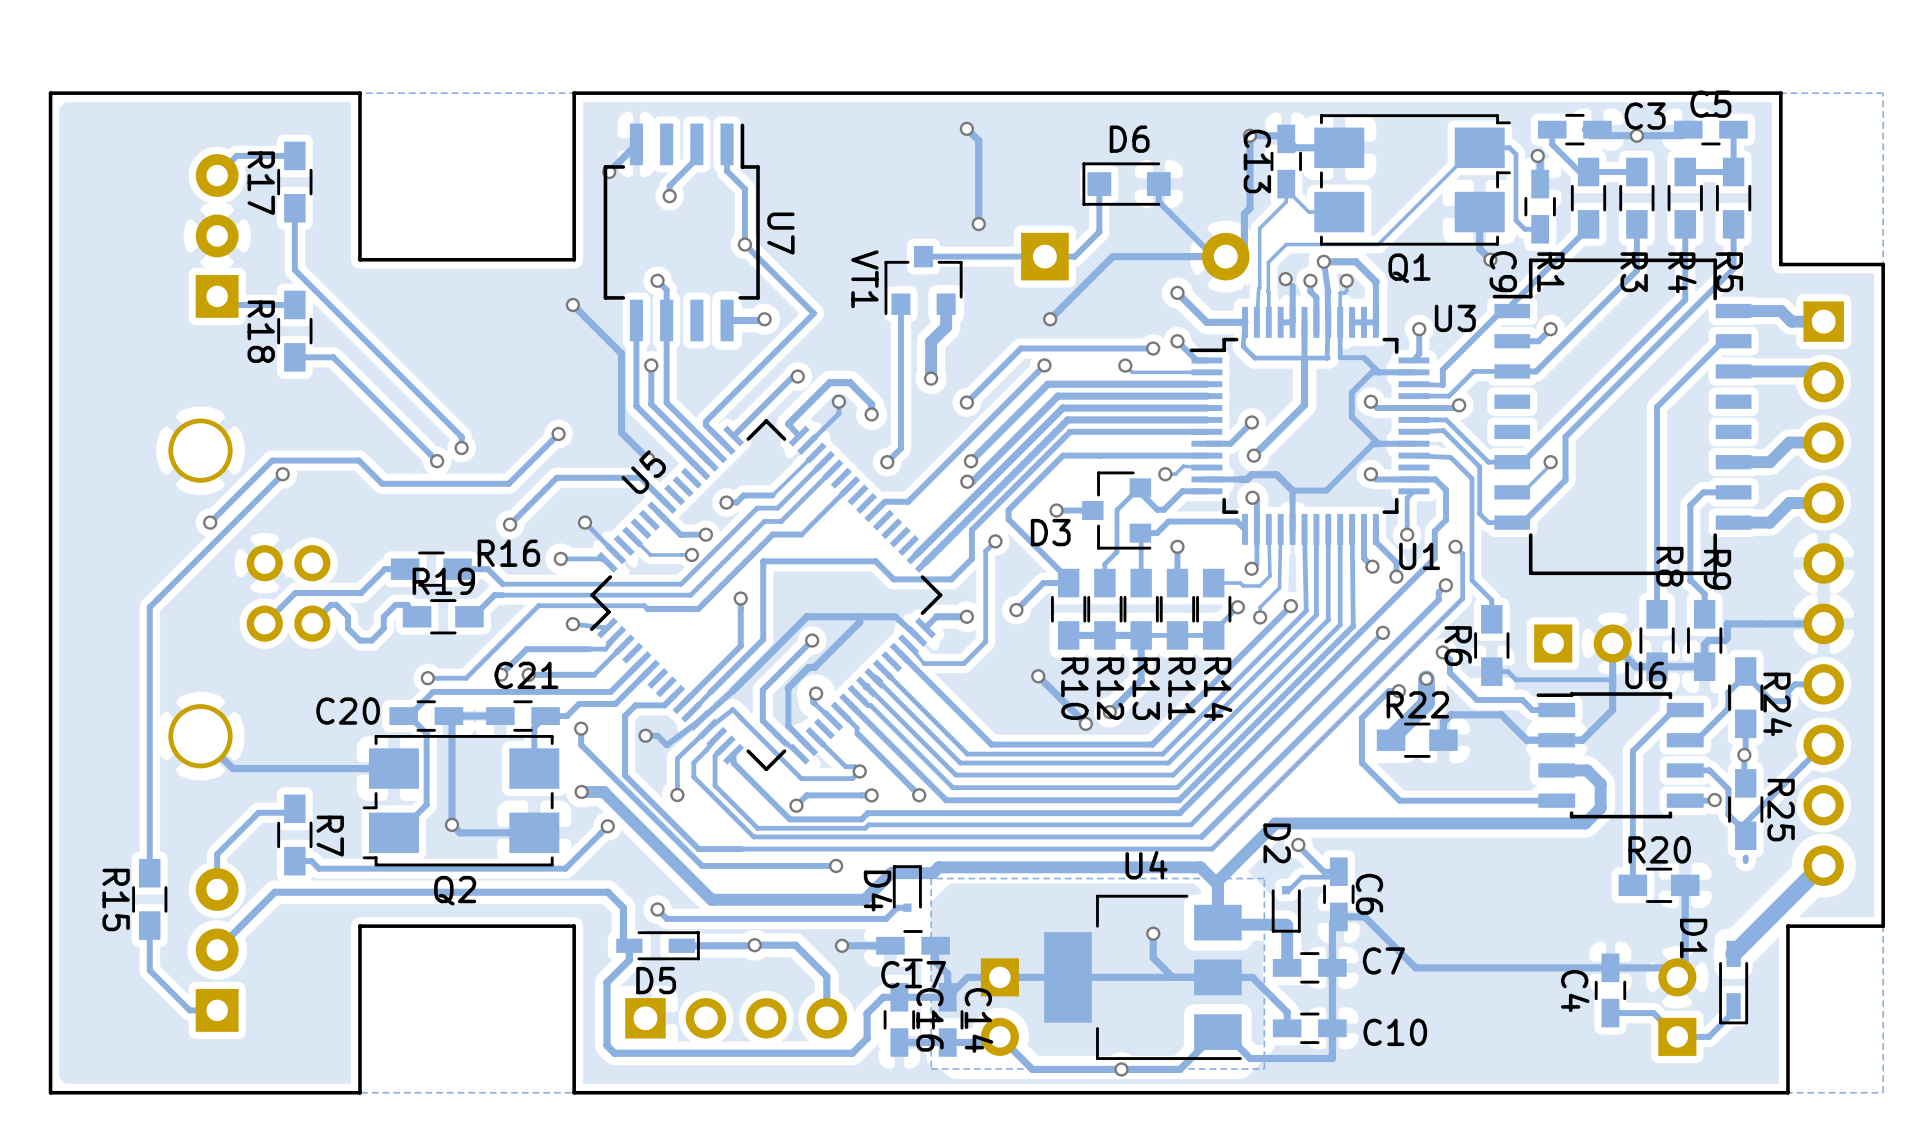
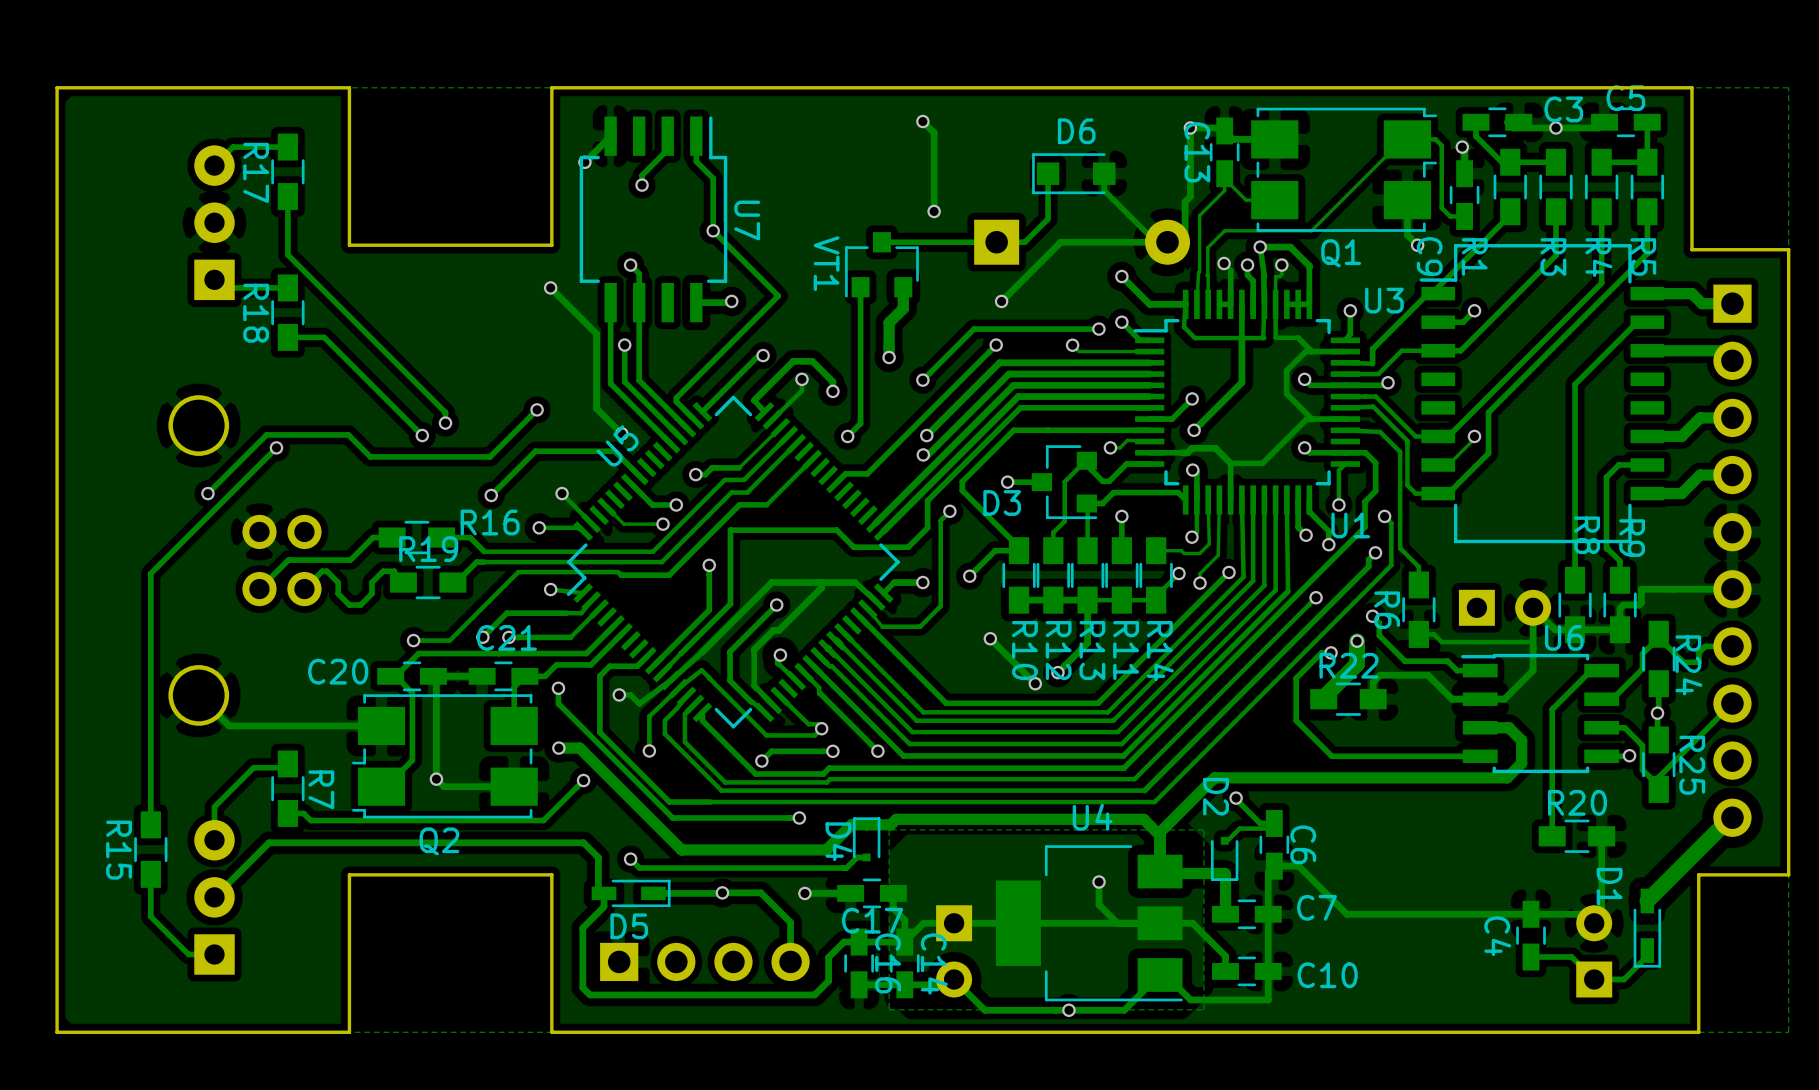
track: (1745, 857) (1745, 861) -> none

